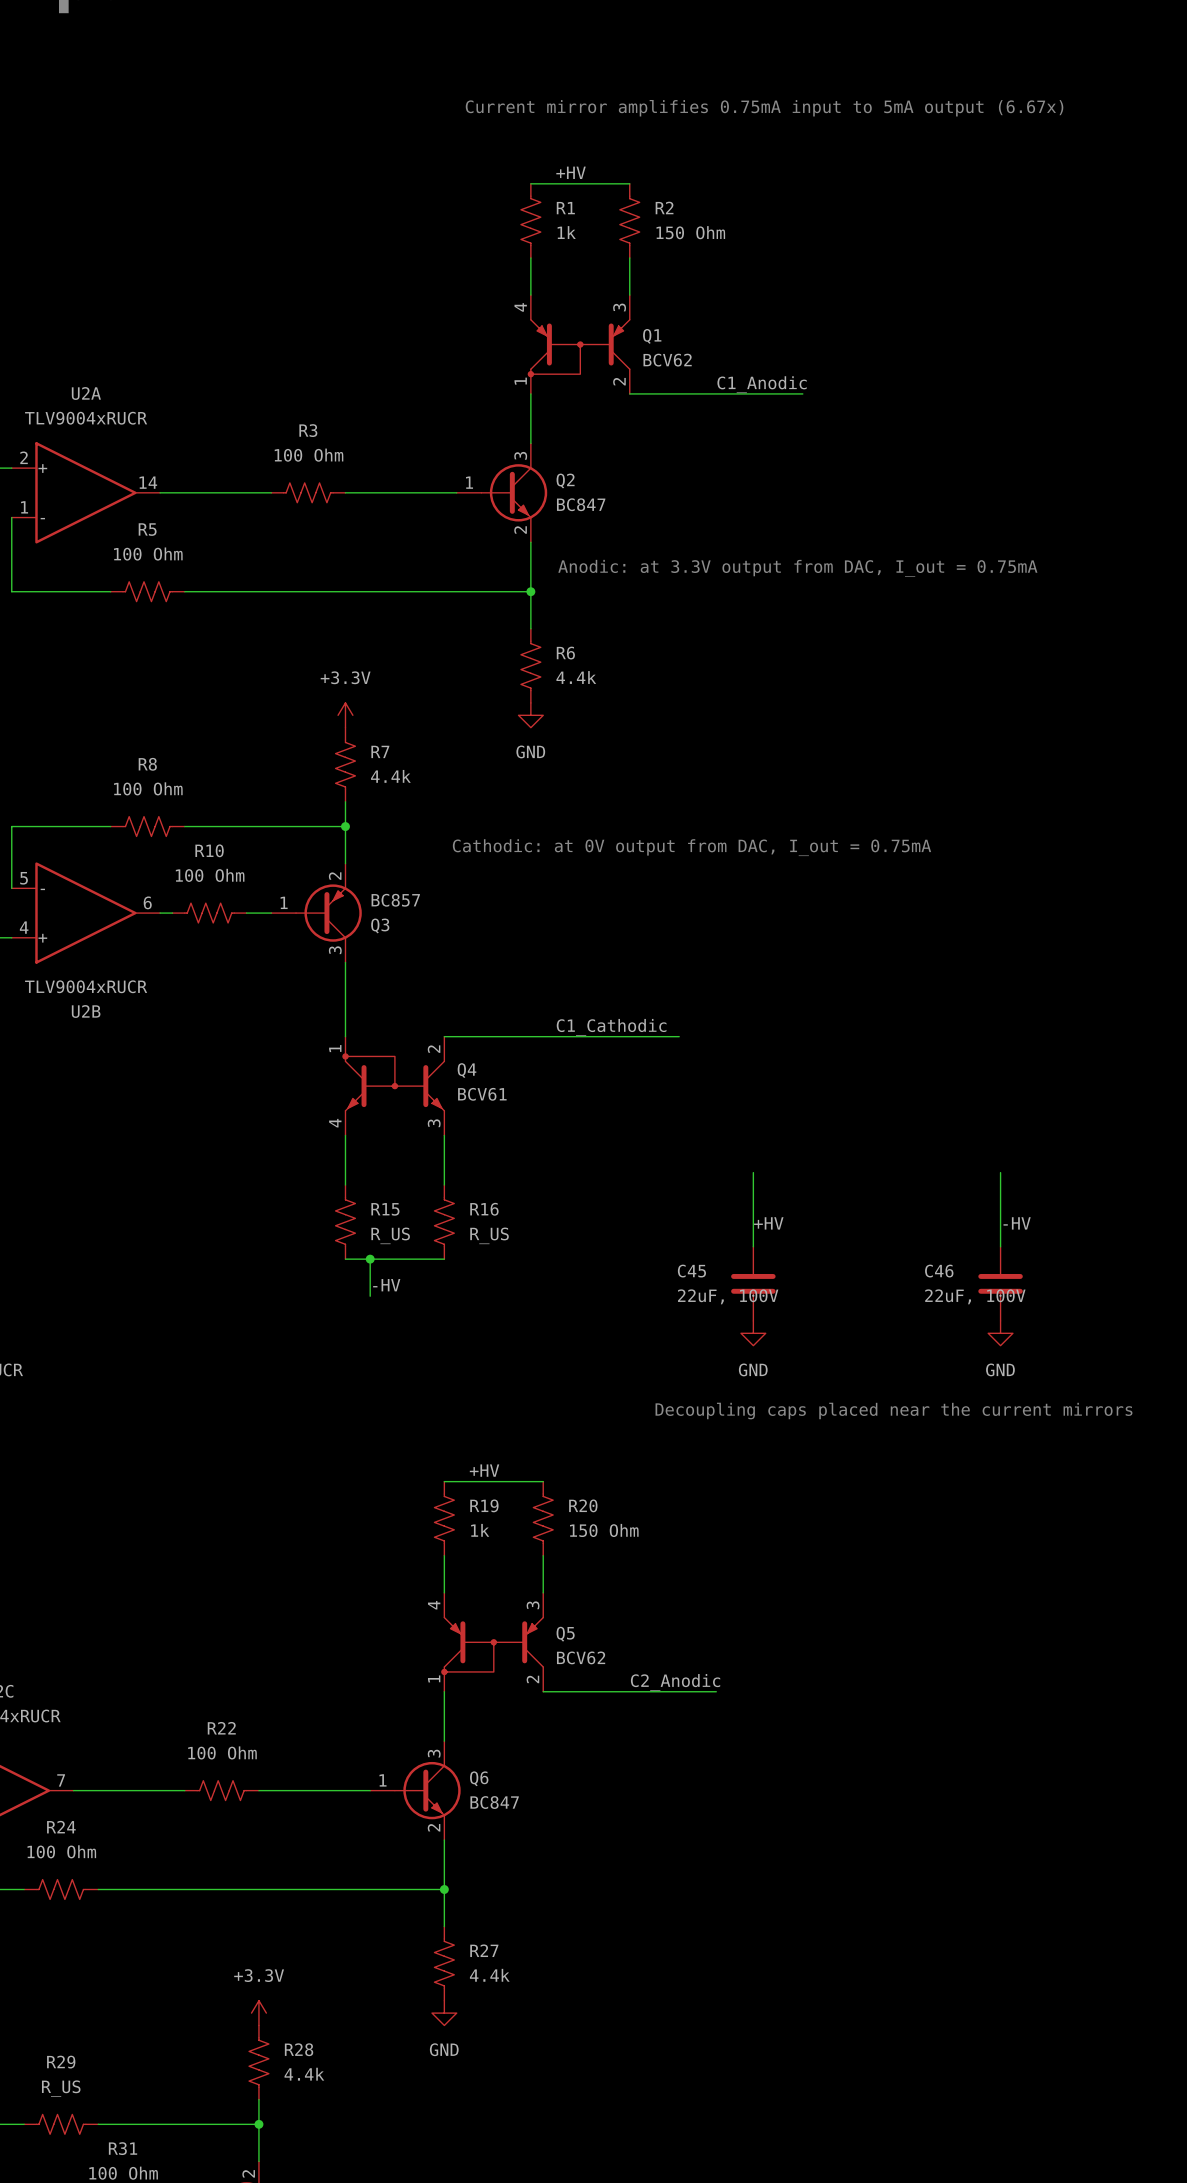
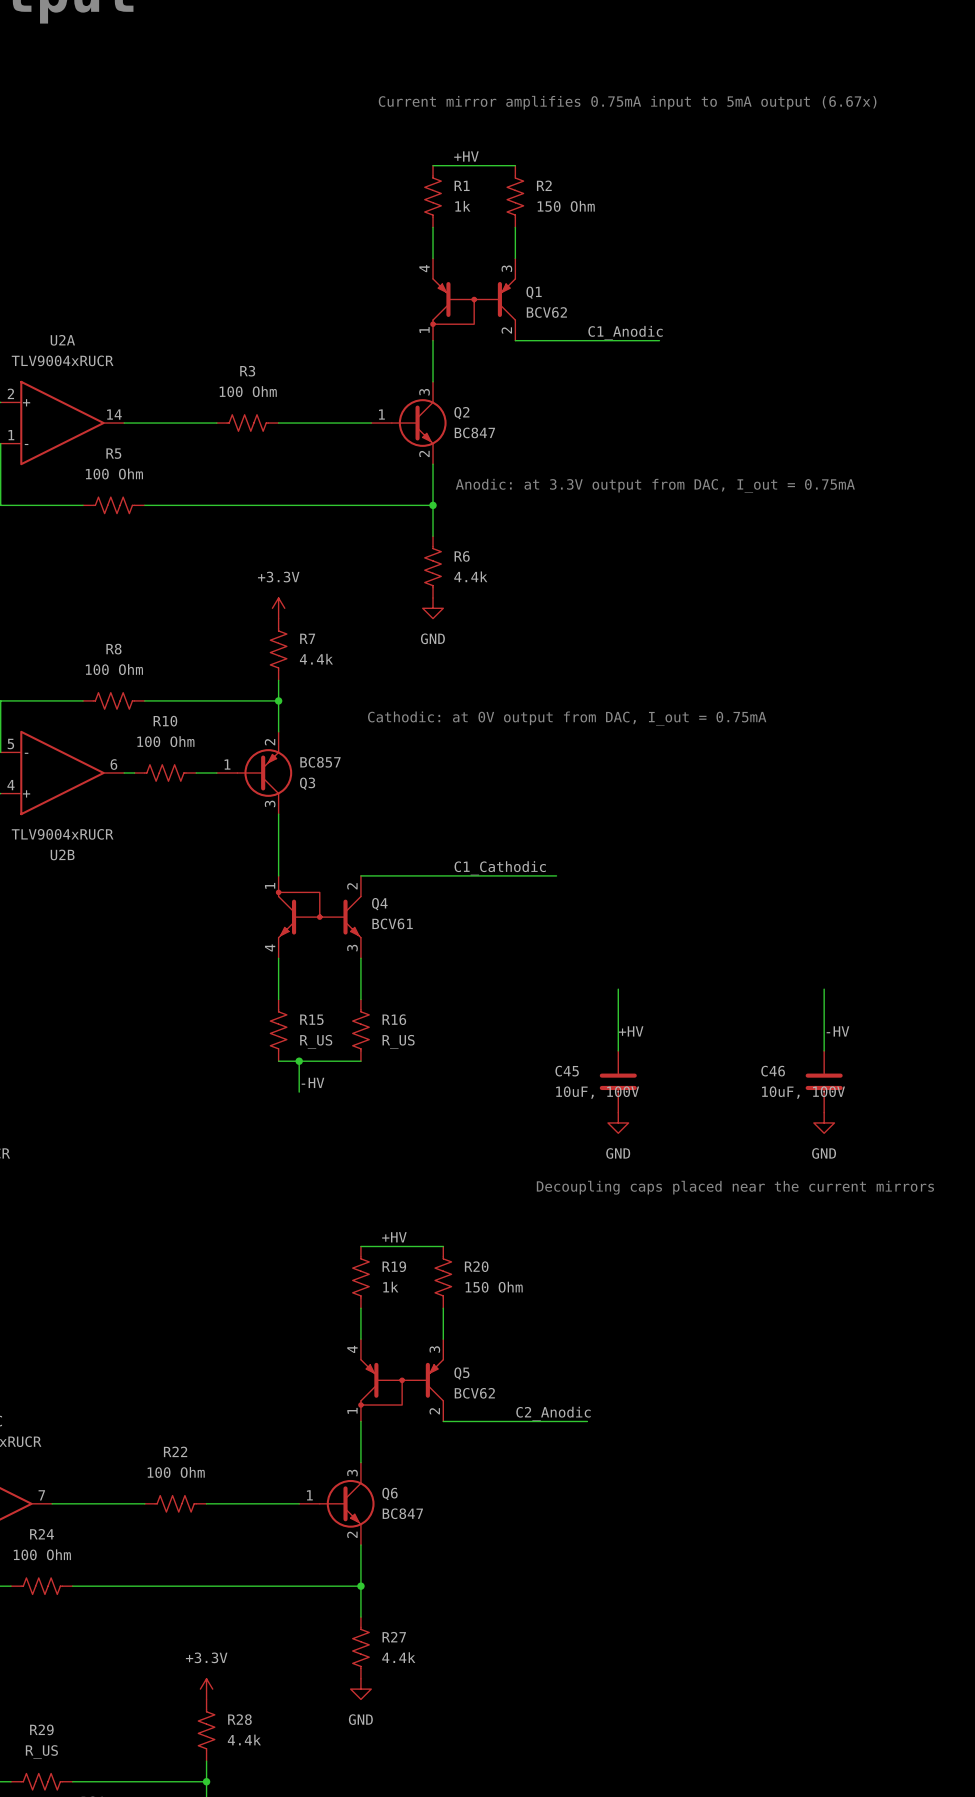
C45 value: 22uF, 100V (728, 1296) -> 10uF, 100V (597, 1092)
C46 value: 22uF, 100V (975, 1296) -> 10uF, 100V (803, 1092)

